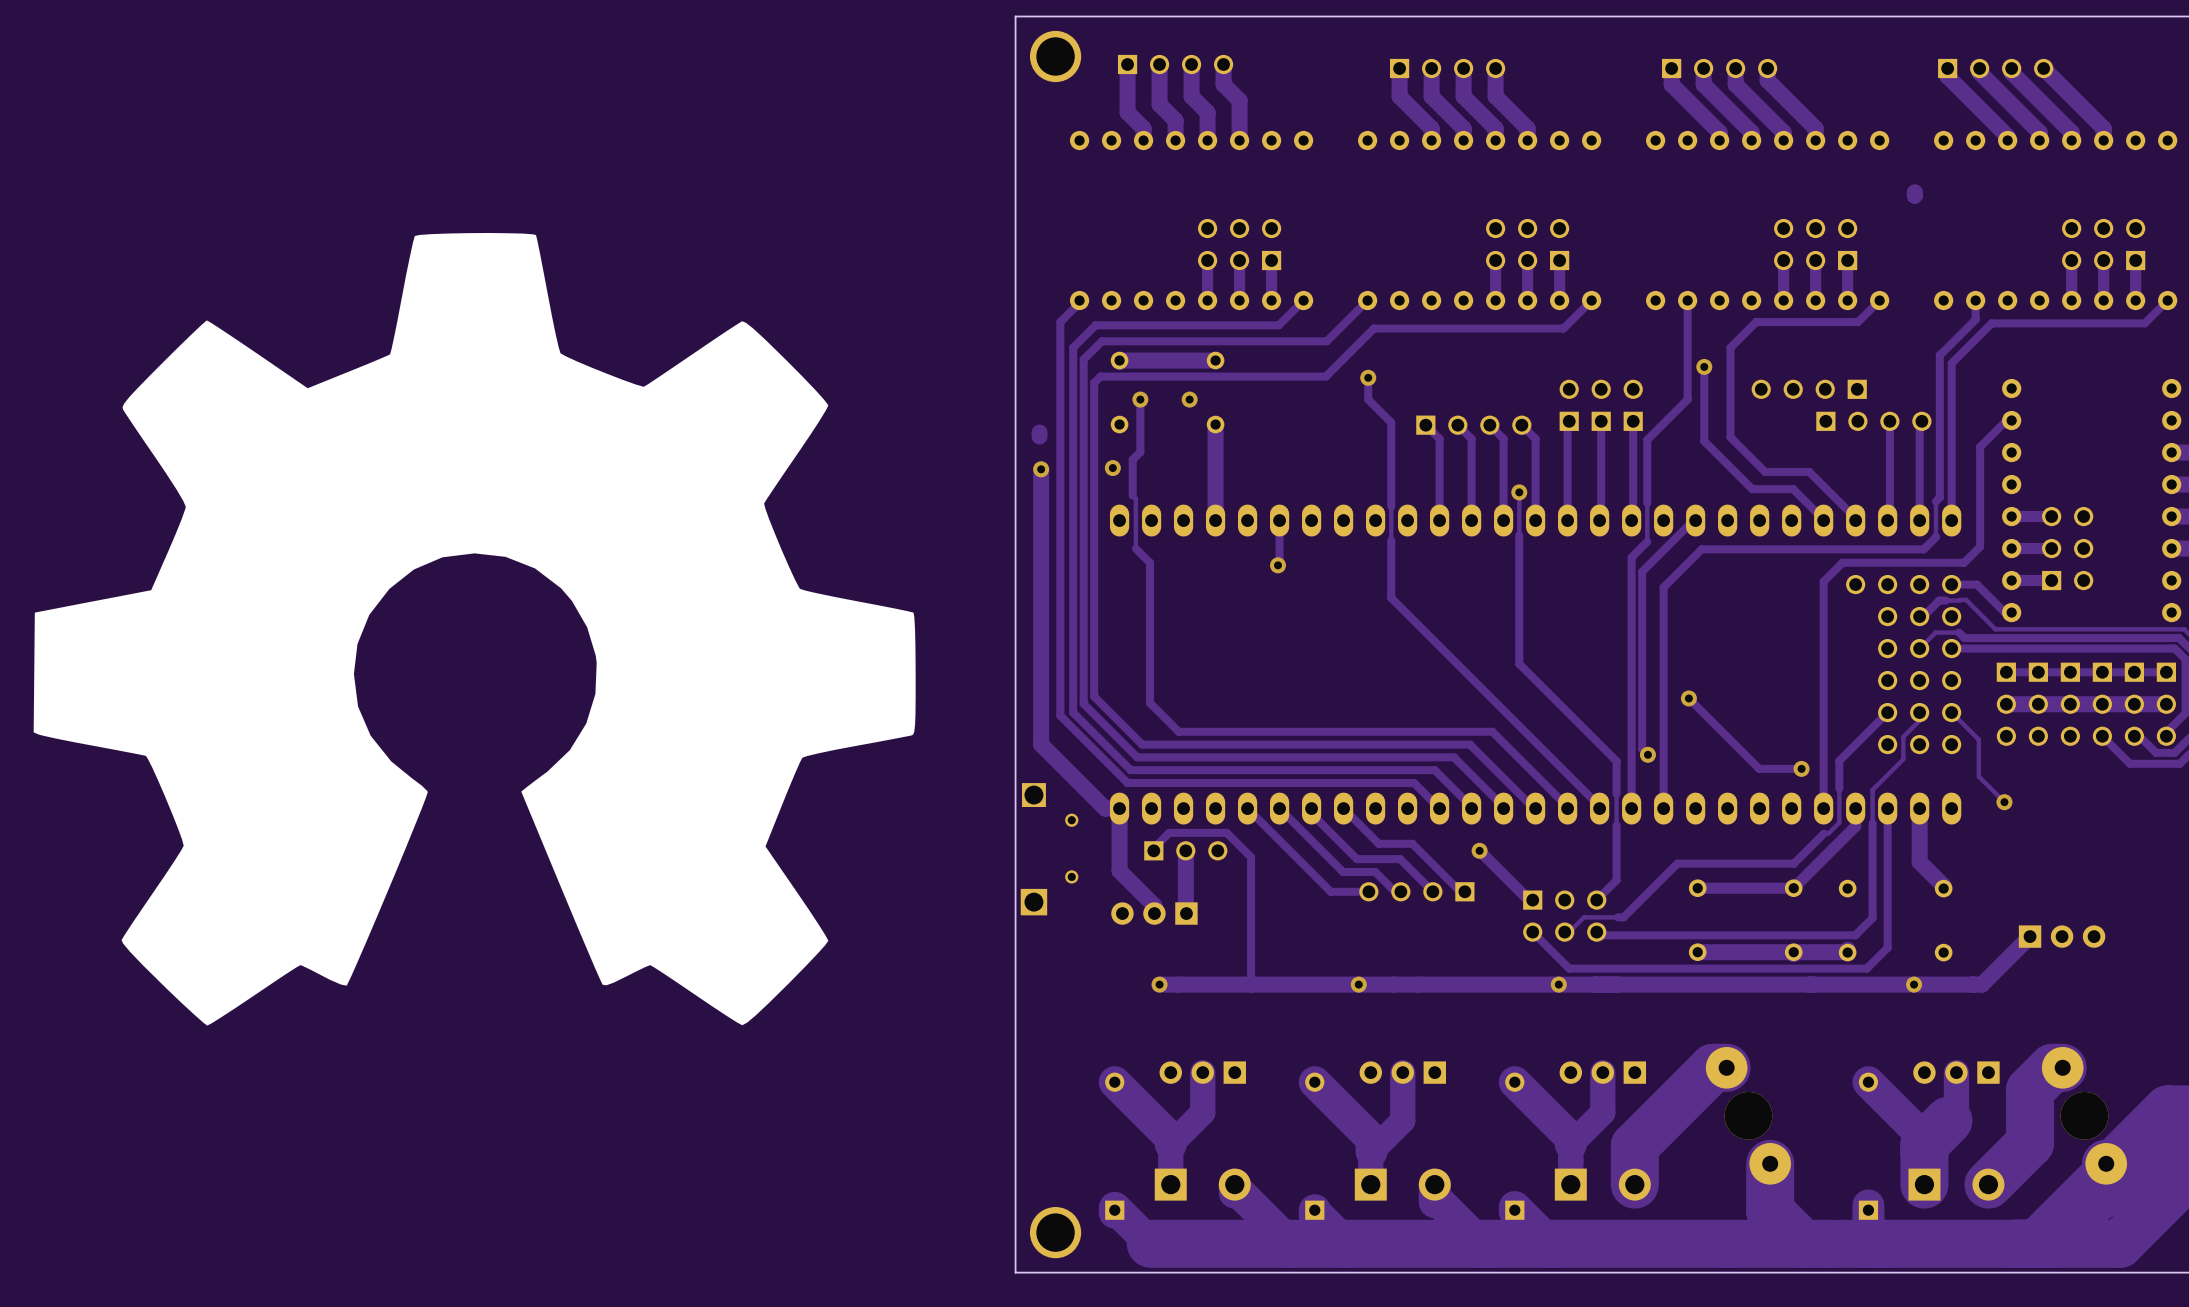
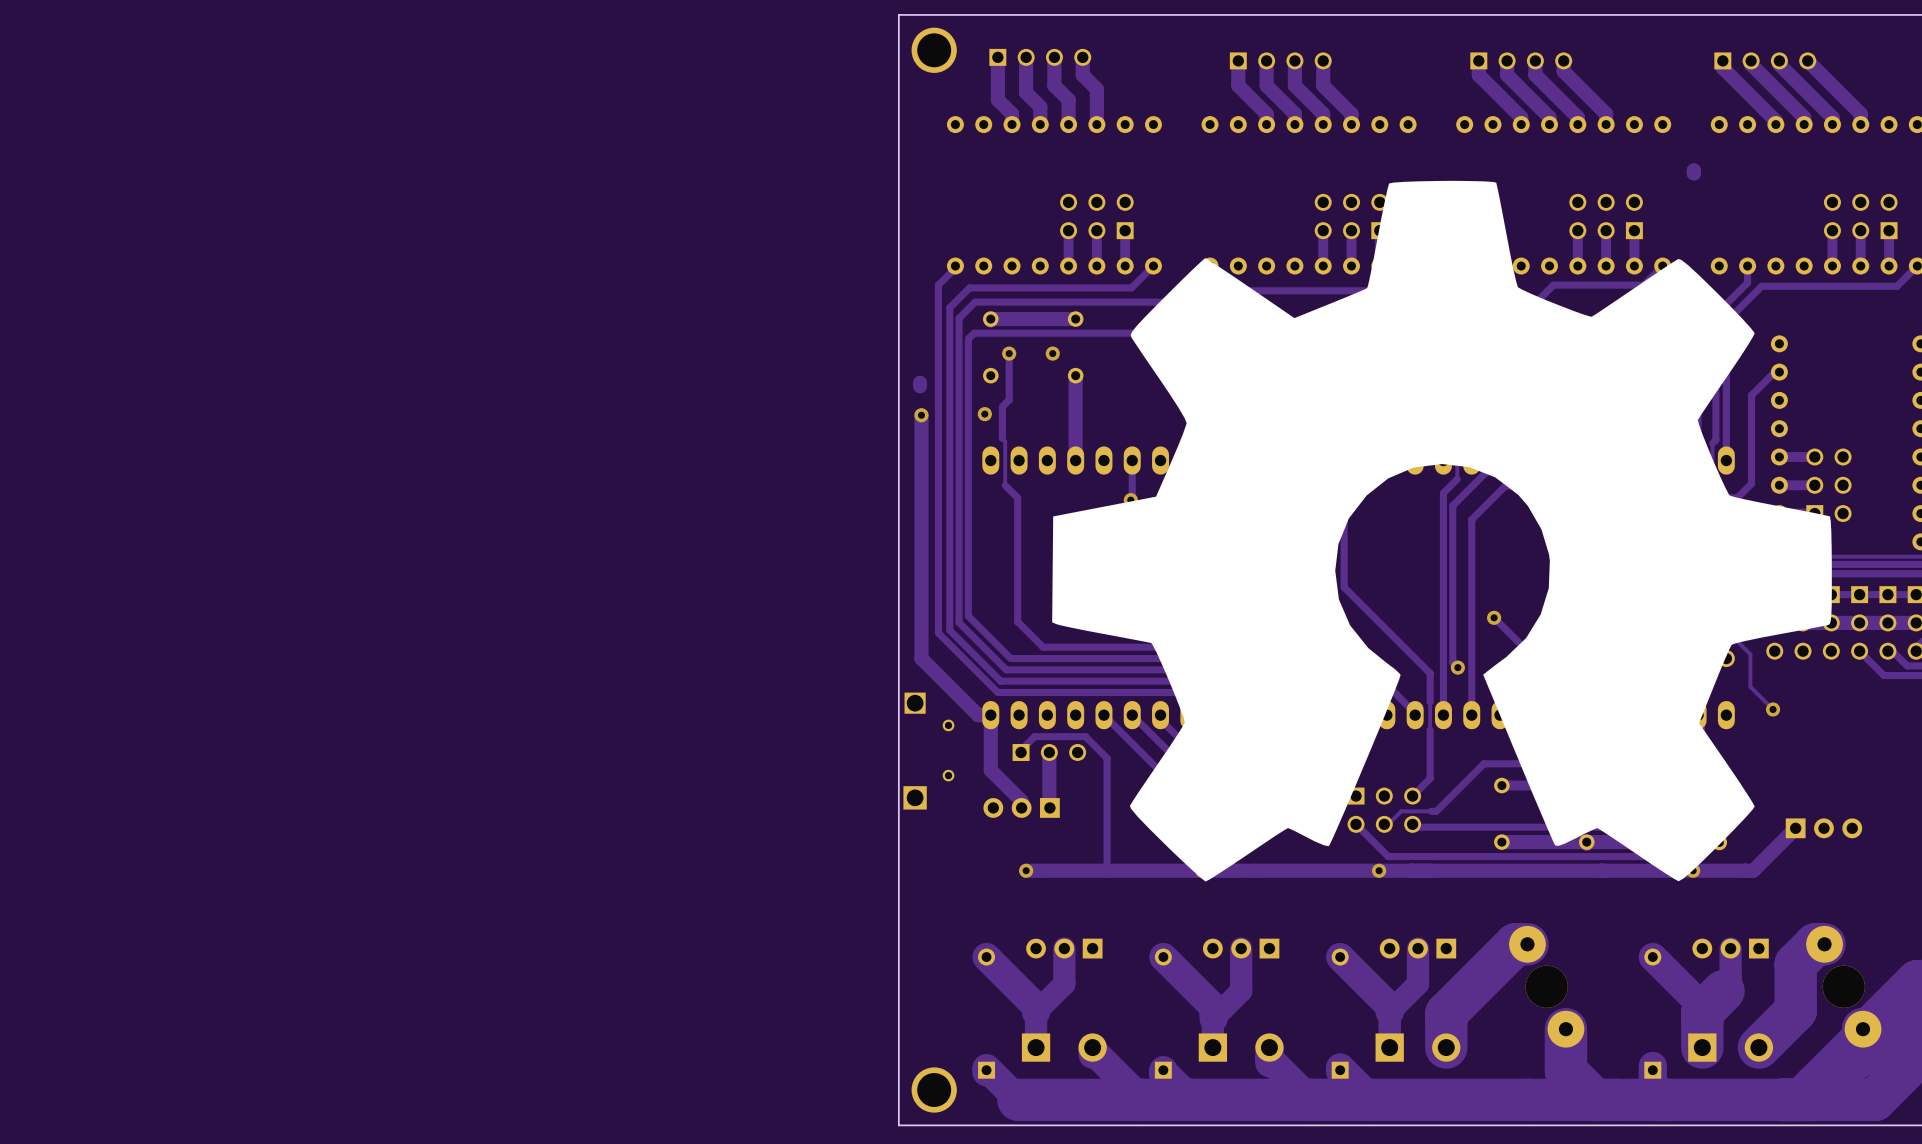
drawing: none -> [1052, 180, 1832, 882]
drawing: [33, 232, 916, 1026] -> none

